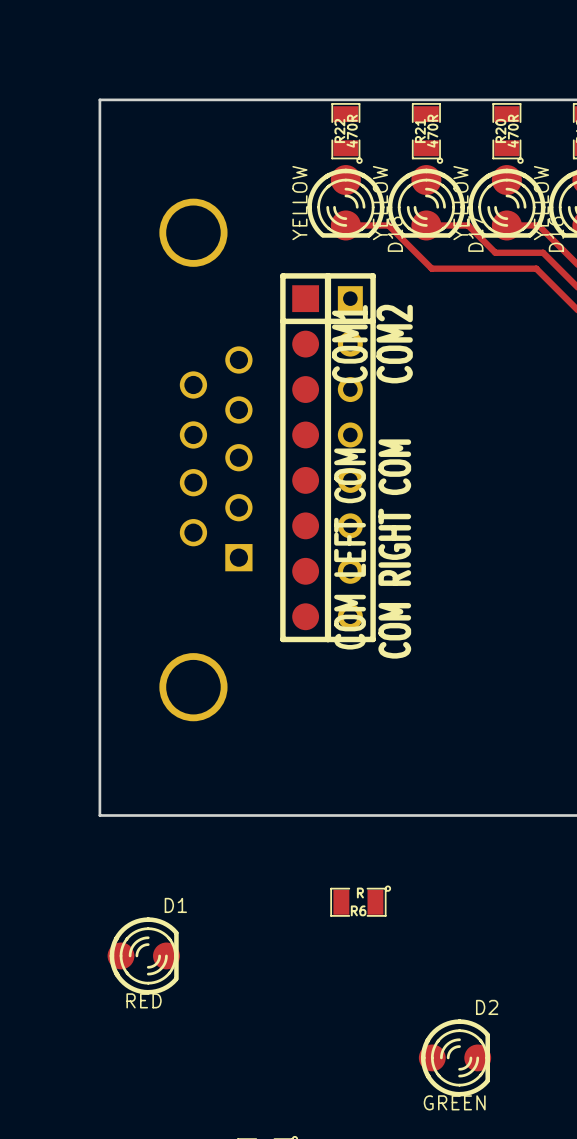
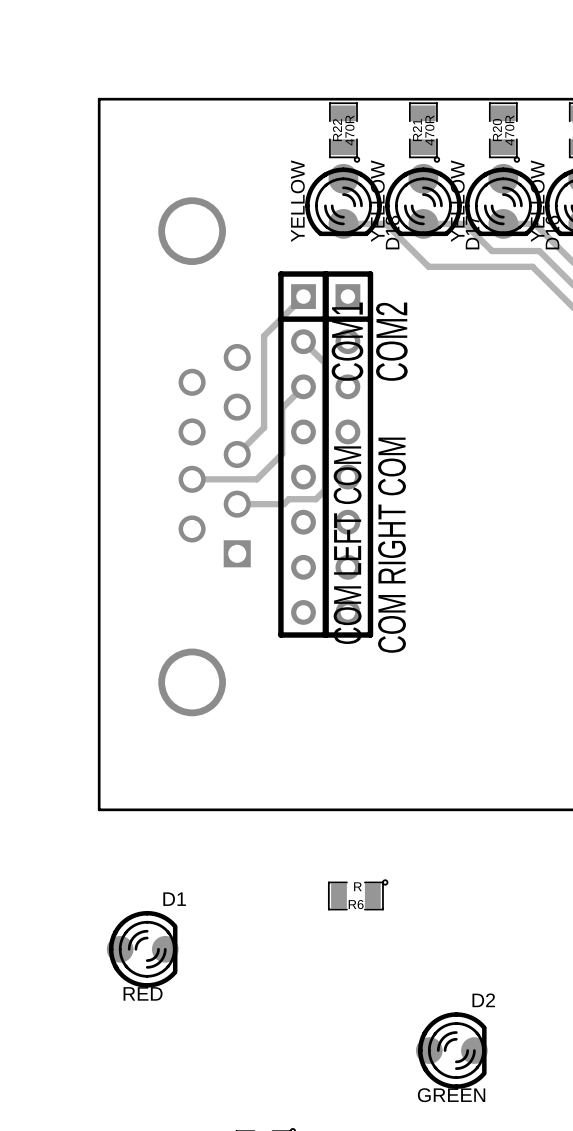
COM1 footprint: [280, 273, 332, 643] -> [278, 271, 329, 638]
track: none -> (303, 296) (264, 335) (264, 427) (237, 454)
track: none -> (303, 341) (325, 363) (325, 490) (315, 499) (288, 499) (283, 504) (237, 504)
track: none -> (303, 386) (282, 408) (282, 454) (256, 479) (192, 479)

